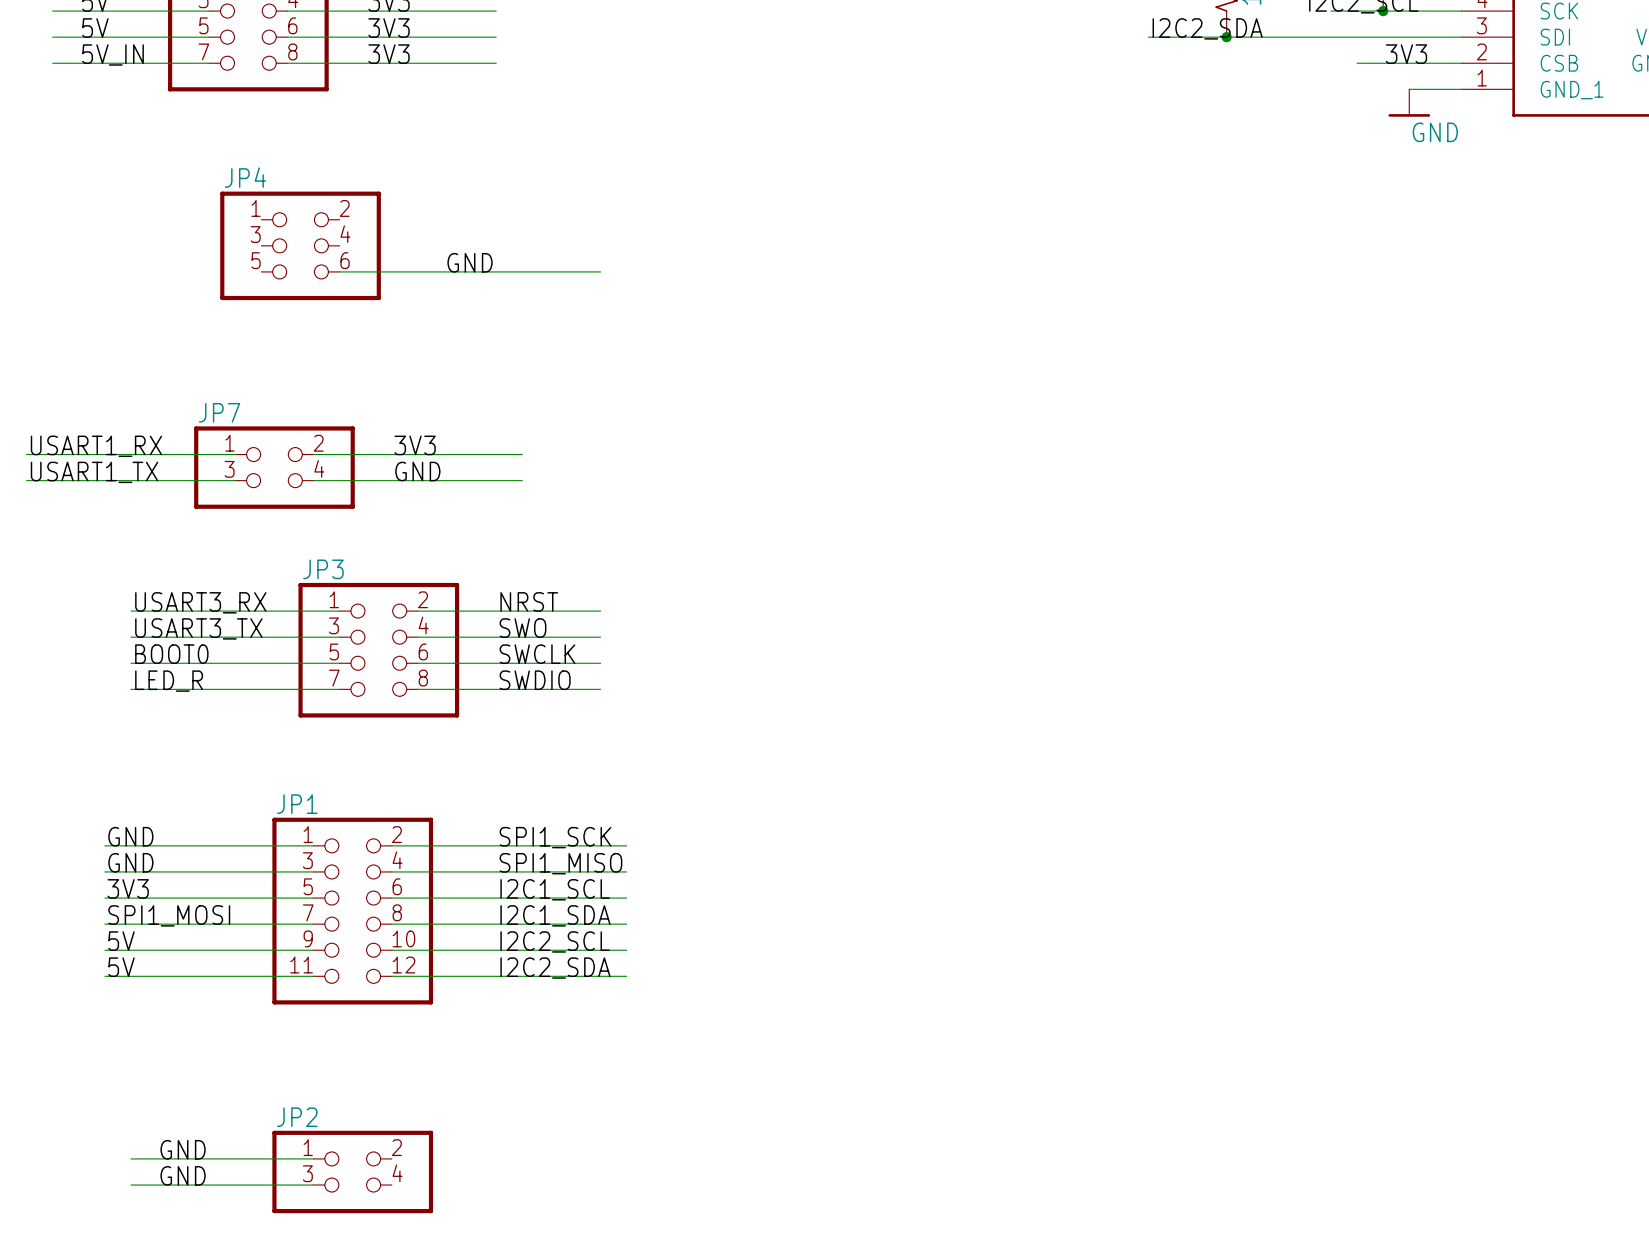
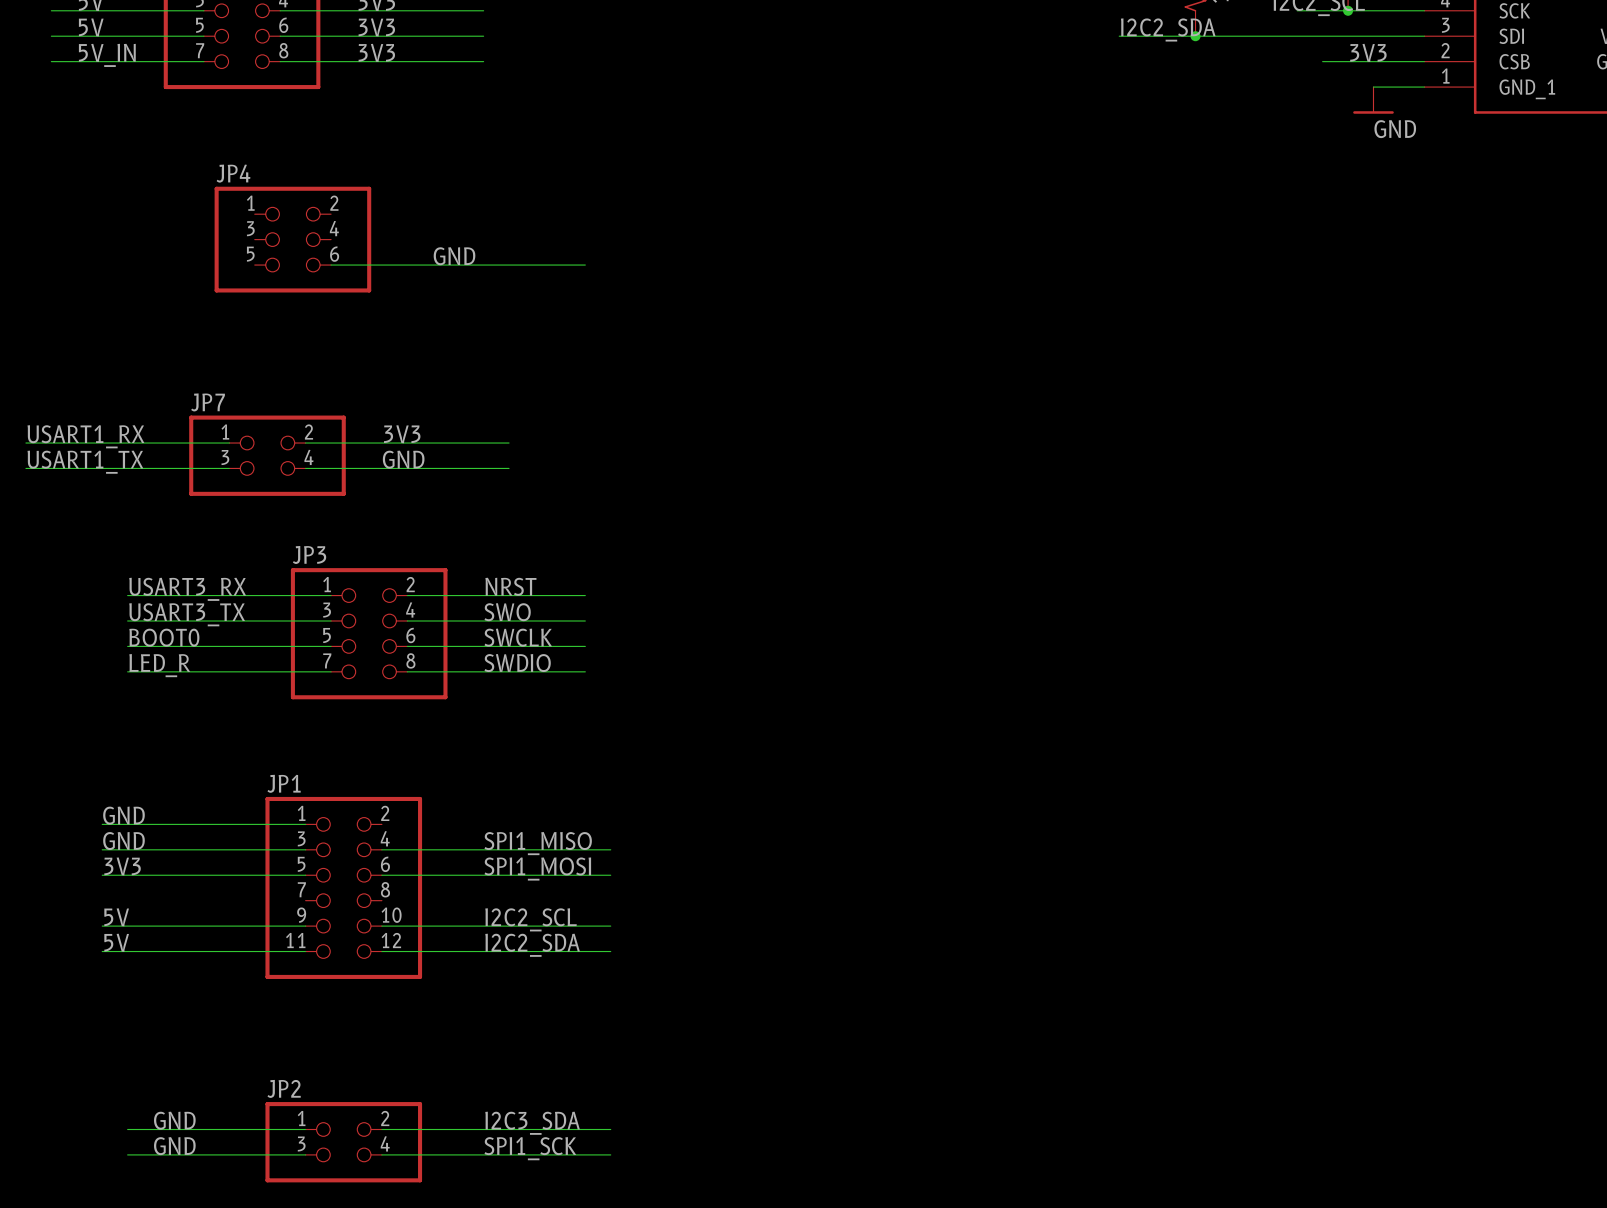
label: SPI1_SCK (555, 837) -> none
wire: (391, 845) (626, 845) -> none
label: I2C1_SCL (555, 889) -> SPI1_MOSI (537, 869)
label: SPI1_MOSI (169, 915) -> none
label: I2C1_SDA (555, 915) -> none
wire: (104, 924) (313, 924) -> none
wire: (391, 924) (626, 924) -> (381, 1129) (610, 1129)
label: none -> I2C3_SDA (532, 1123)
label: none -> SPI1_SCK (530, 1148)
wire: none -> (381, 1154) (610, 1154)

